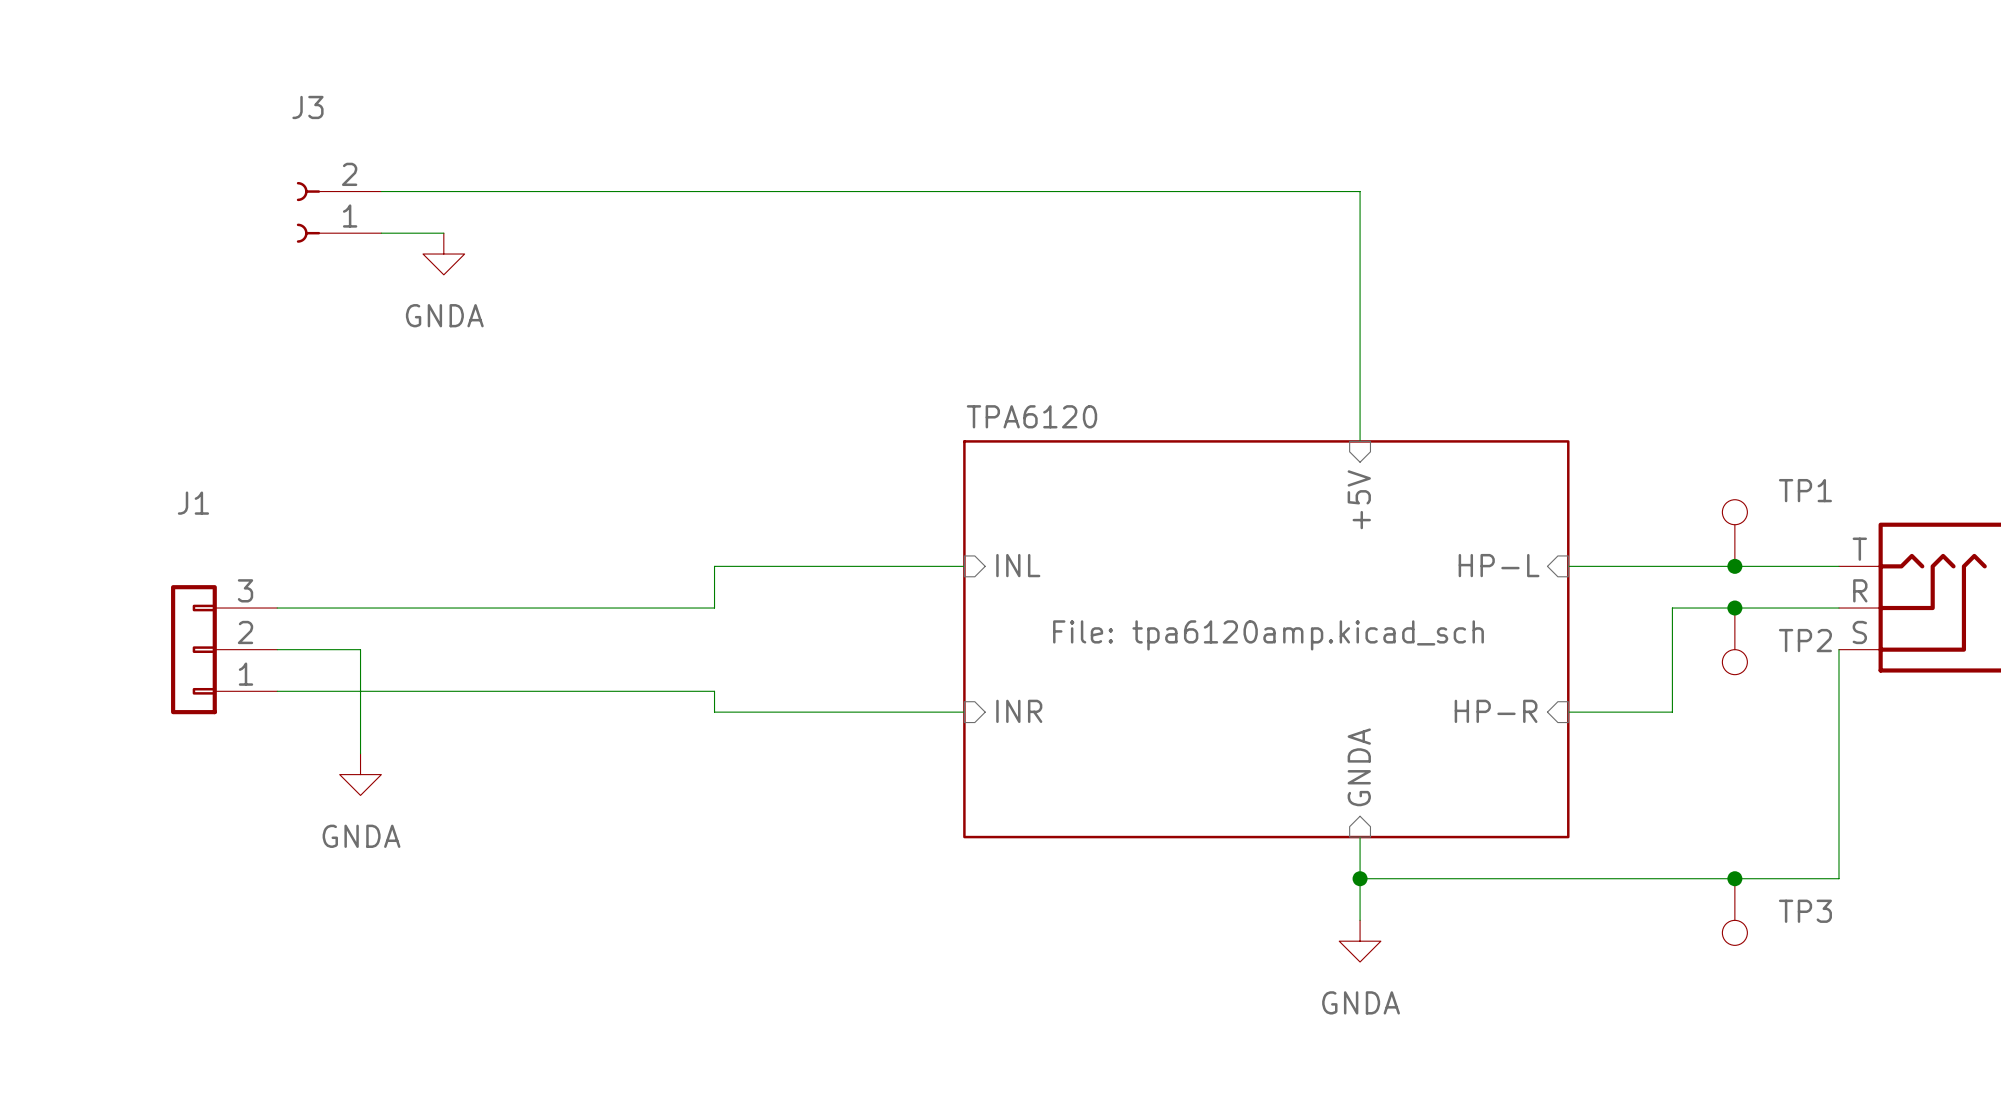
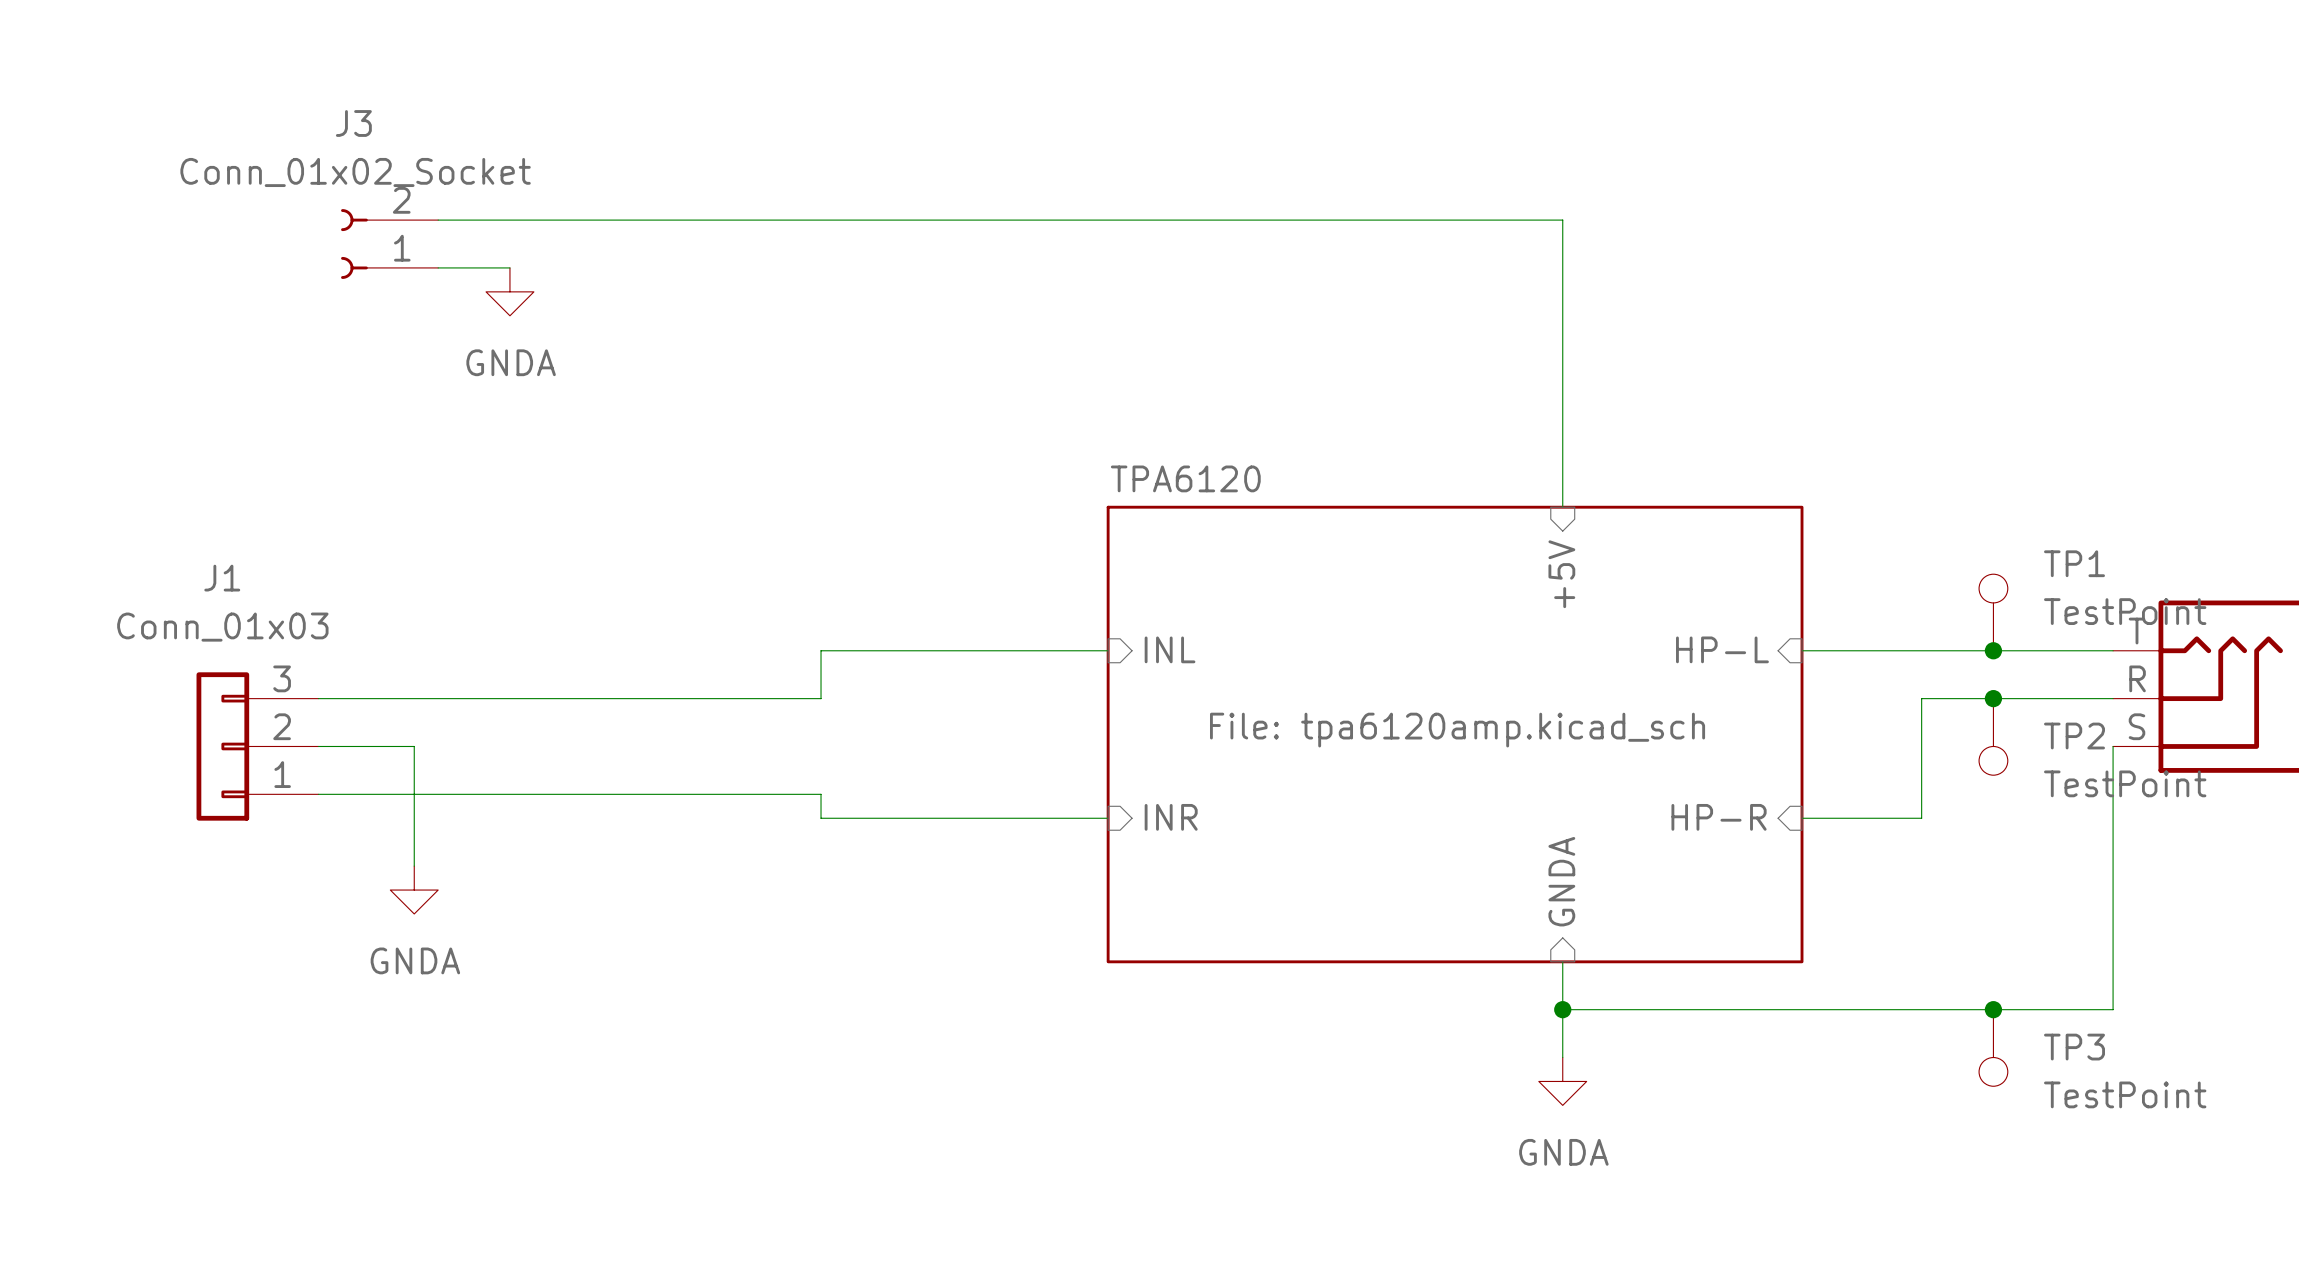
J3 value: none -> Conn_01x02_Socket (355, 172)
TP1 value: none -> TestPoint (2125, 611)
J1 value: none -> Conn_01x03 (222, 627)
TP2 value: none -> TestPoint (2125, 783)
TP3 value: none -> TestPoint (2125, 1094)

